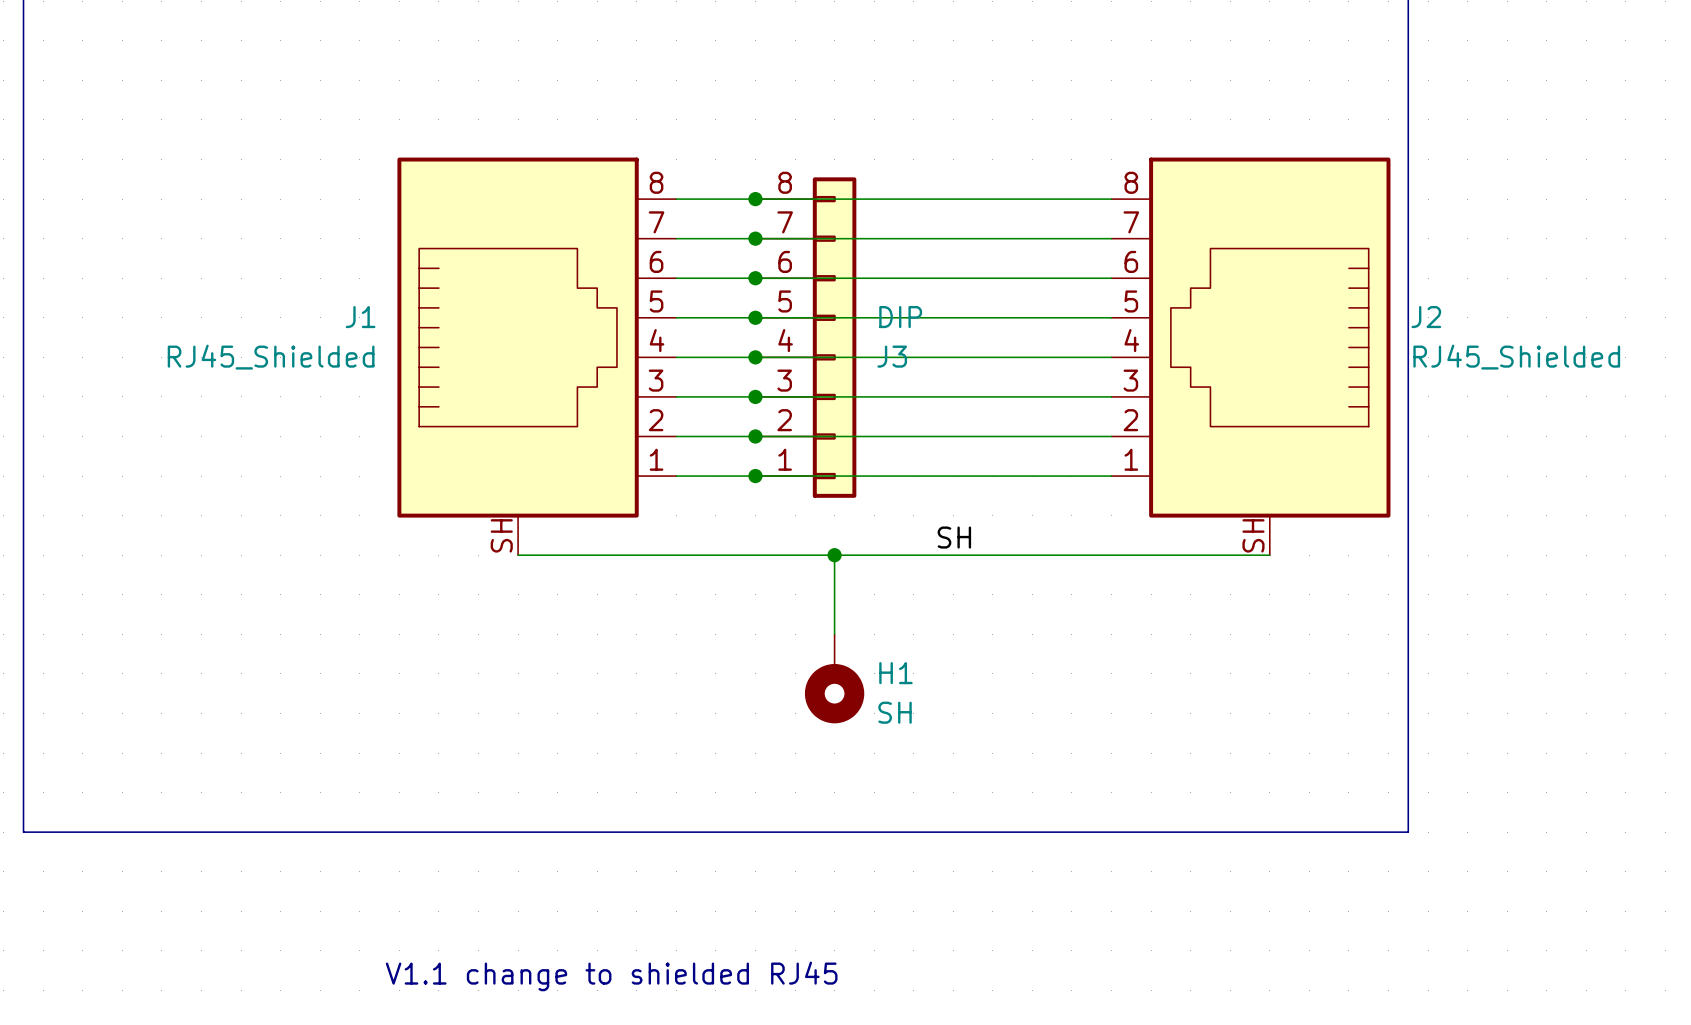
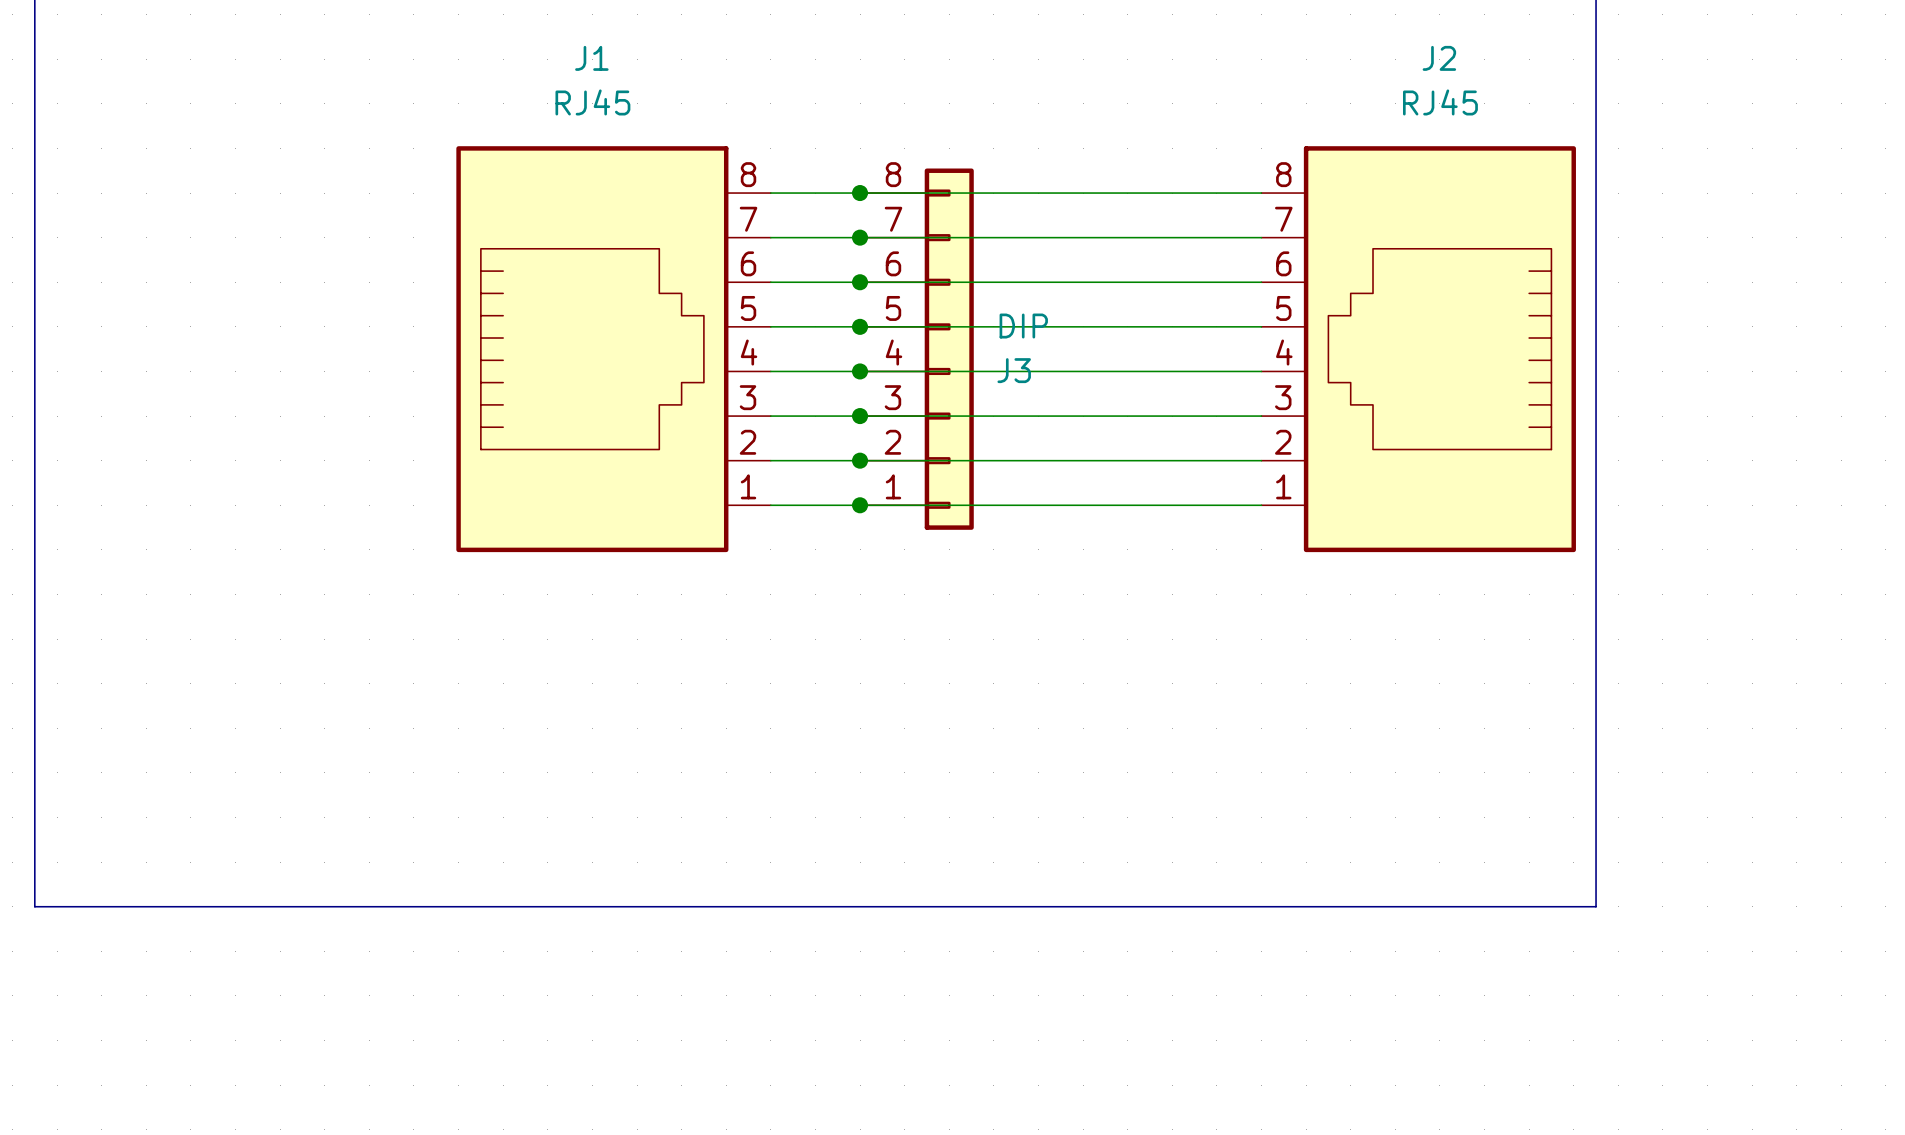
J1 symbol: [397, 157, 677, 556] -> [456, 146, 771, 553]
J2 symbol: [1111, 157, 1391, 556] -> [1261, 146, 1576, 553]
J1 name position: J1 (360, 317) -> J1 (591, 58)
J2 name position: J2 (1426, 317) -> J2 (1439, 58)
J1 value: RJ45_Shielded (271, 357) -> RJ45 (592, 102)
J2 value: RJ45_Shielded (1516, 357) -> RJ45 (1440, 102)
label: SH (954, 537) -> none
wire: (518, 555) (1269, 555) -> none
wire: (834, 555) (834, 634) -> none
junction: (834, 555) -> none
H1: SH (834, 678) -> none
text: V1.1 change to shielded RJ45 (611, 976) -> none

